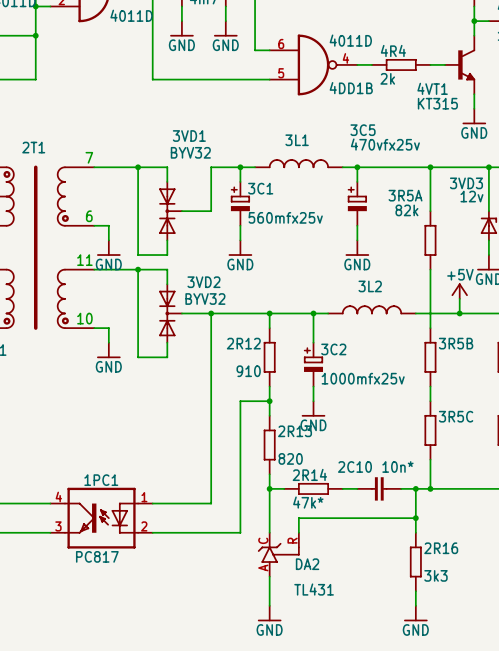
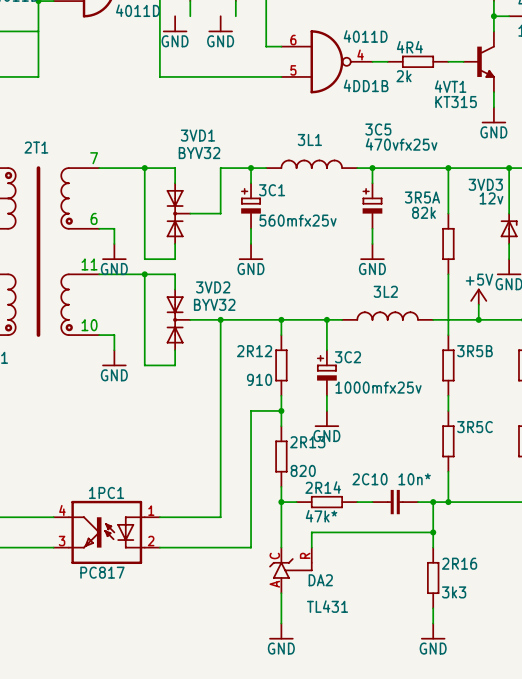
power symbol: none -> GND (175, 24)
power symbol: GND (181, 28) -> none
power symbol: none -> GND (220, 24)
power symbol: GND (225, 28) -> none
junction: (35, 35) -> none

